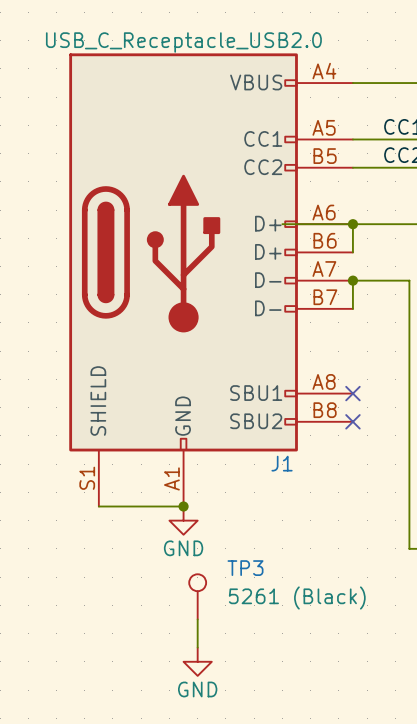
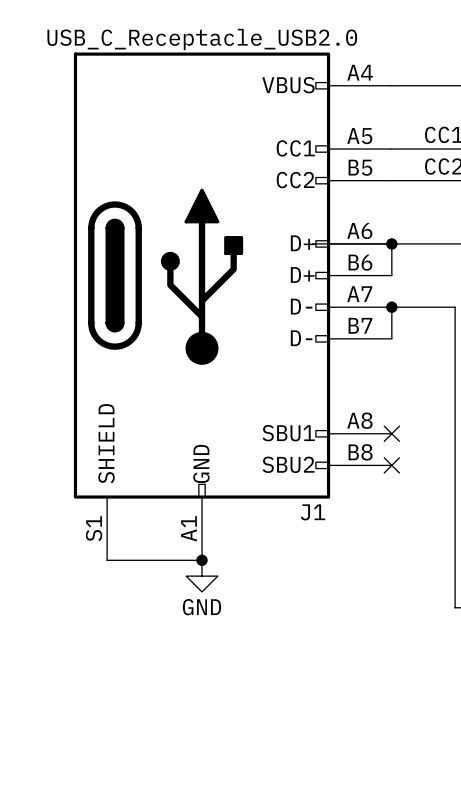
TP3: 5261 (Black) (197, 596) -> none
wire: (197, 619) (197, 647) -> none
power symbol: GND (197, 661) -> none

